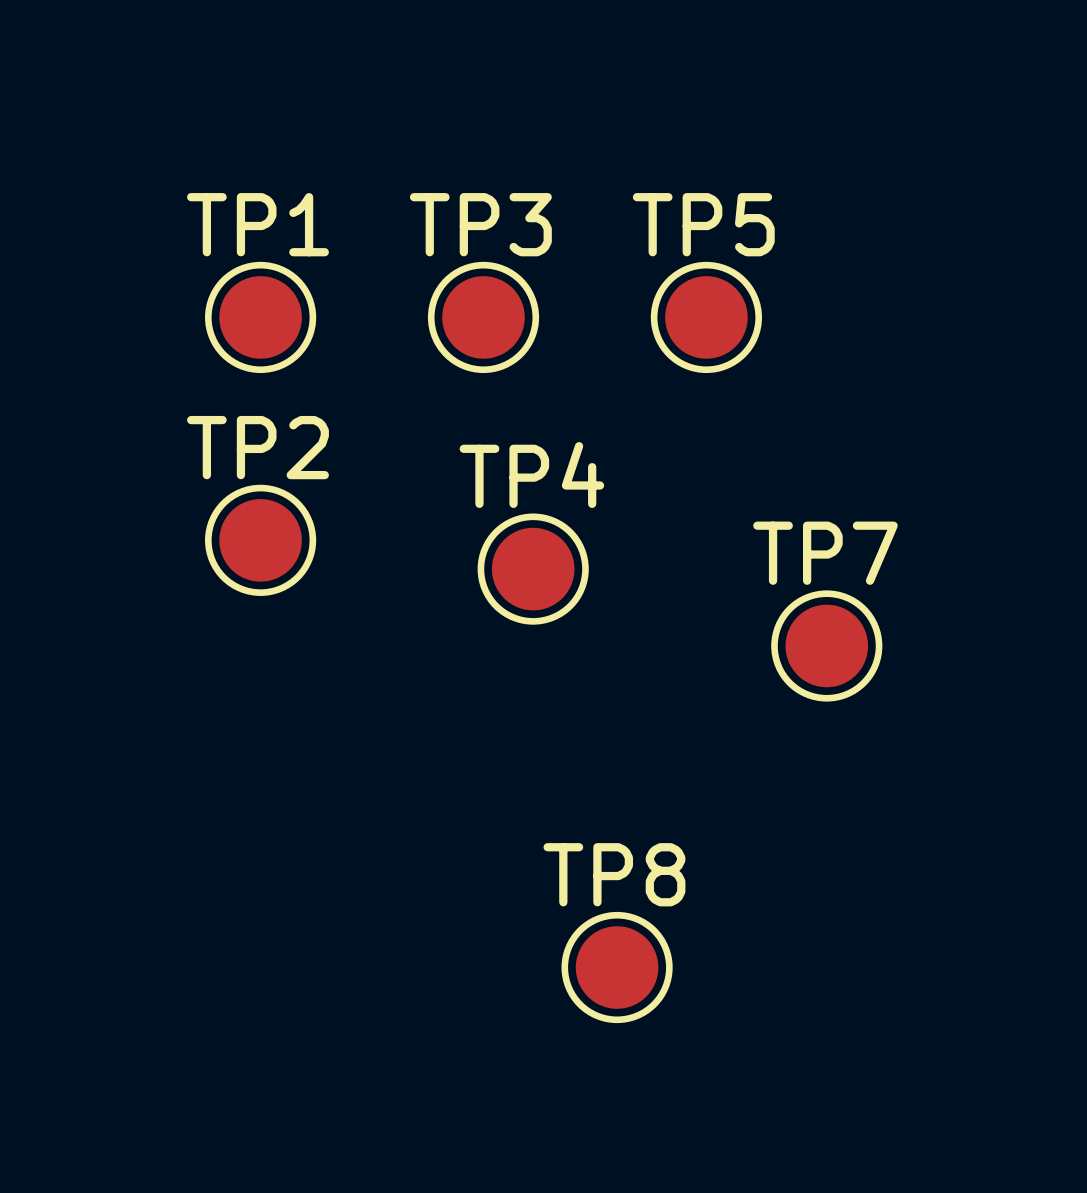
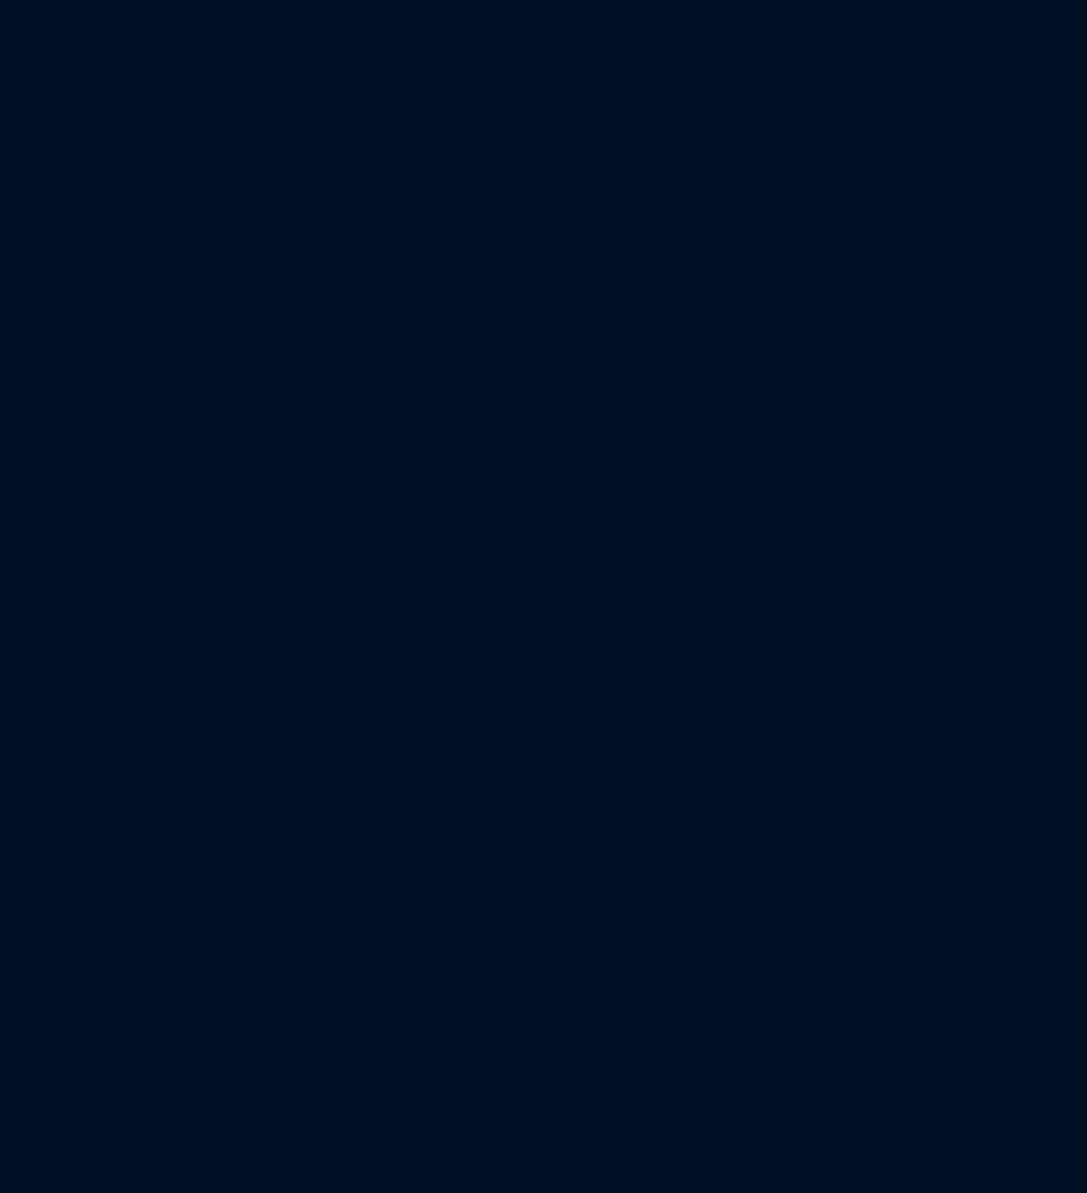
TP1: (260, 317) -> none
TP3: (483, 317) -> none
TP5: (706, 317) -> none
TP2: (260, 540) -> none
TP4: (533, 569) -> none
TP7: (826, 645) -> none
TP8: (617, 967) -> none

